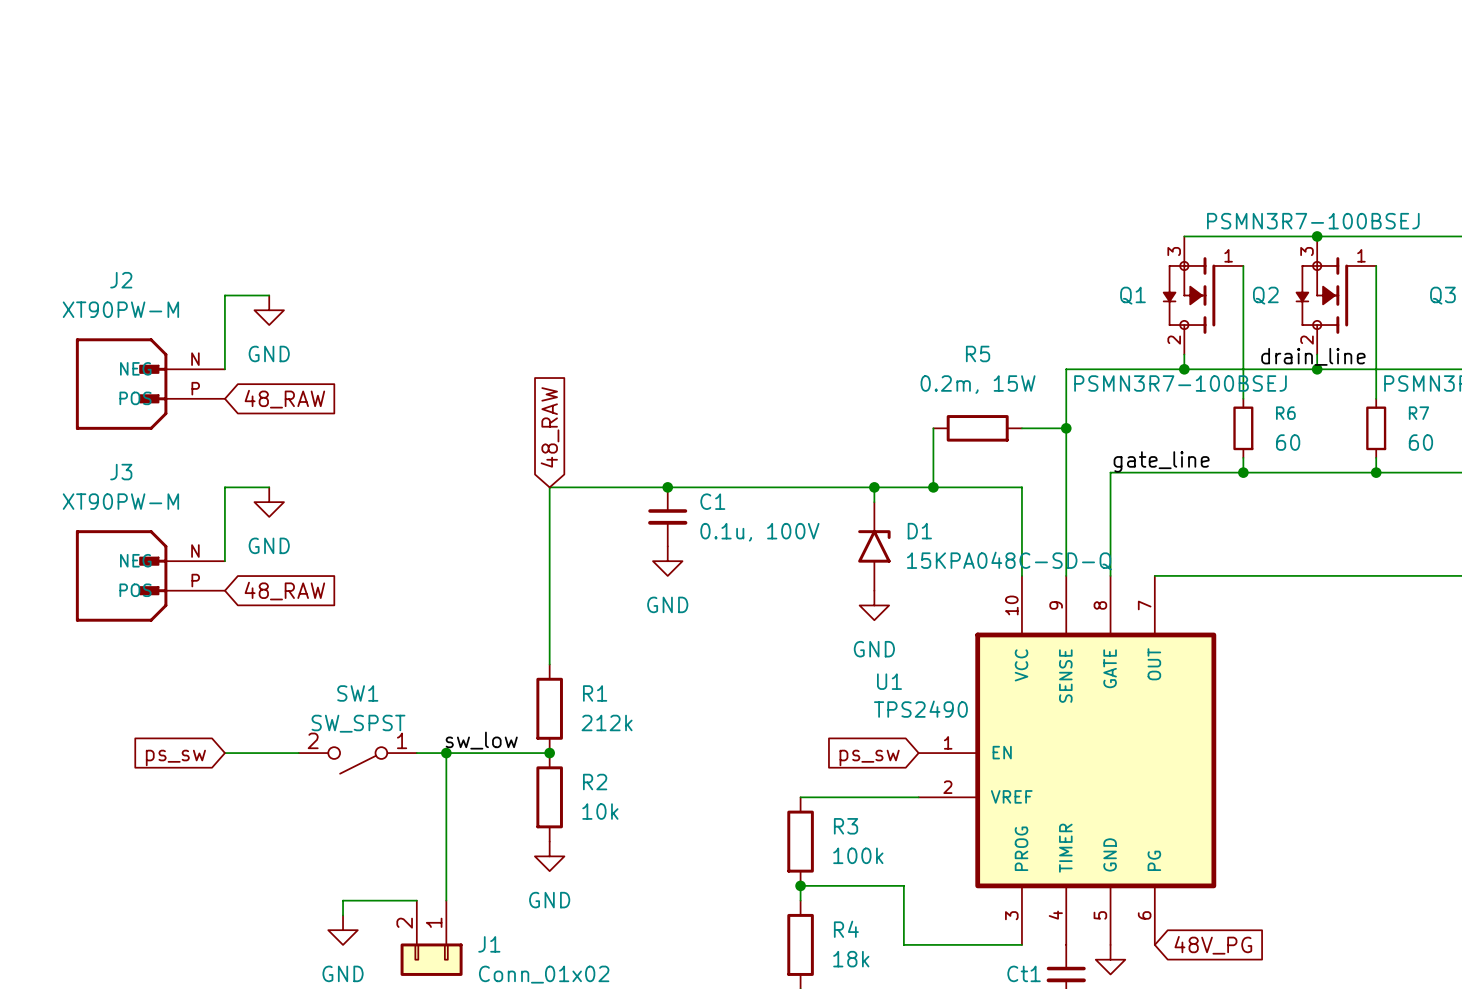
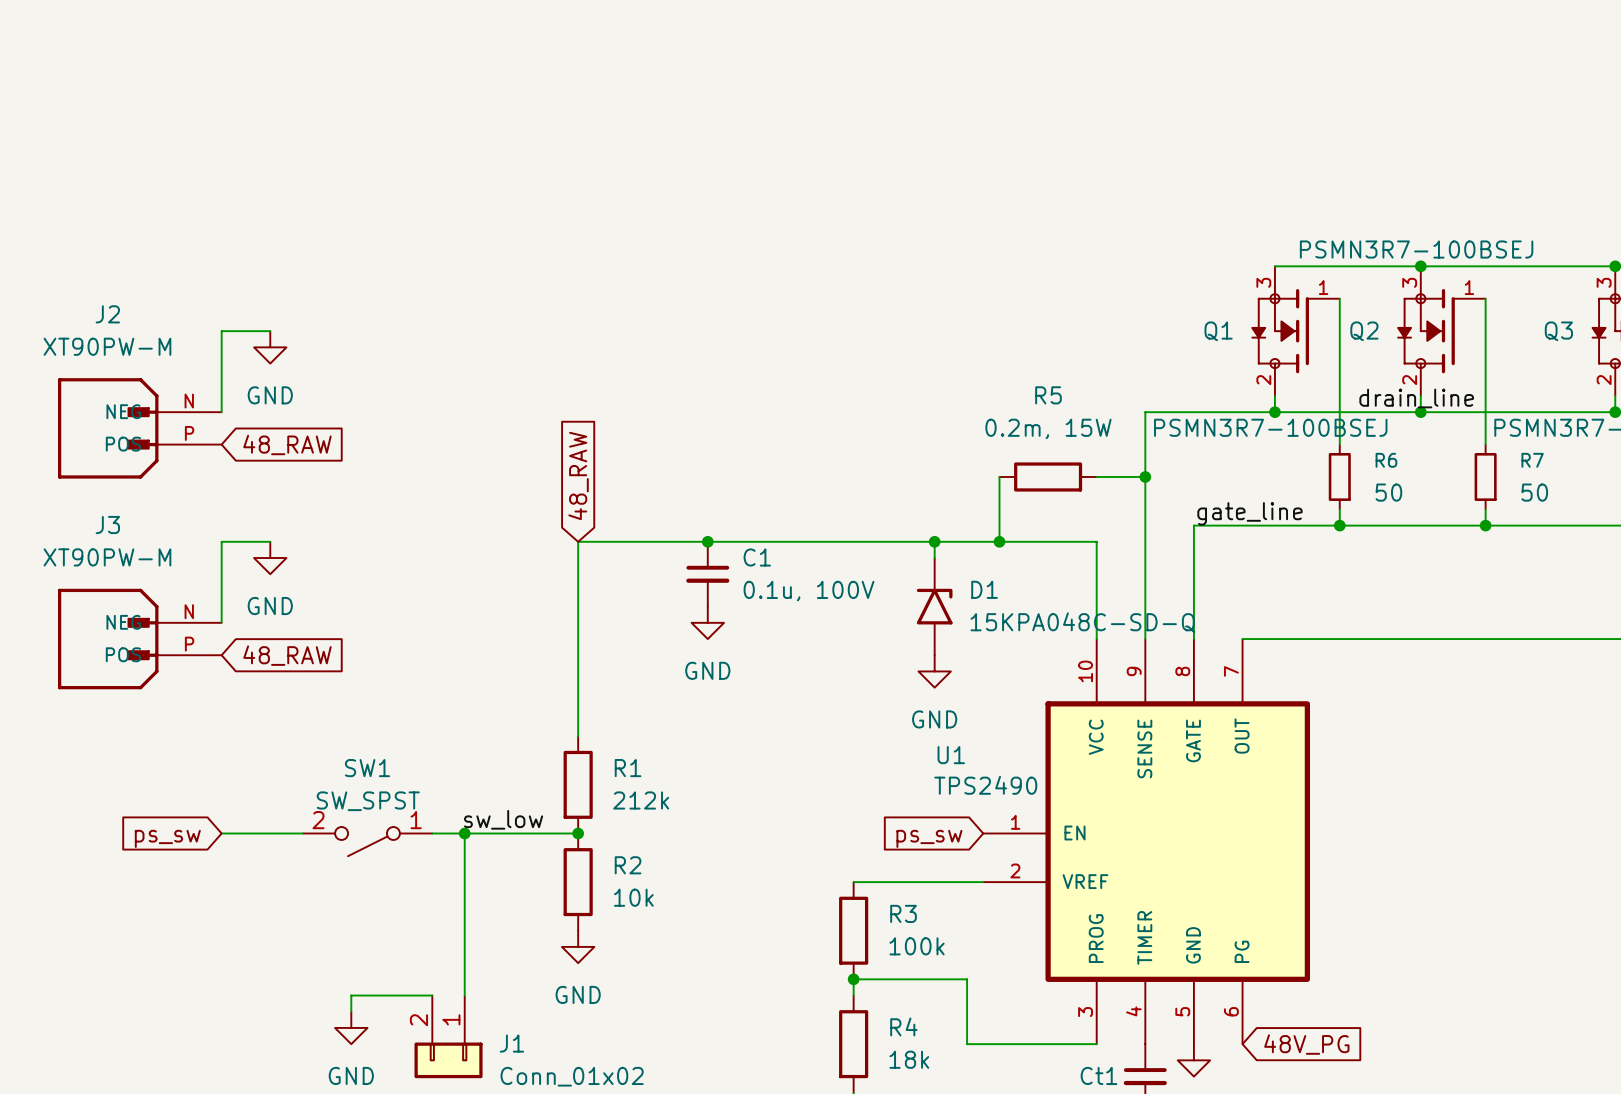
R6 value: 60 (1288, 442) -> 50 (1388, 492)
R7 value: 60 (1420, 442) -> 50 (1534, 492)

